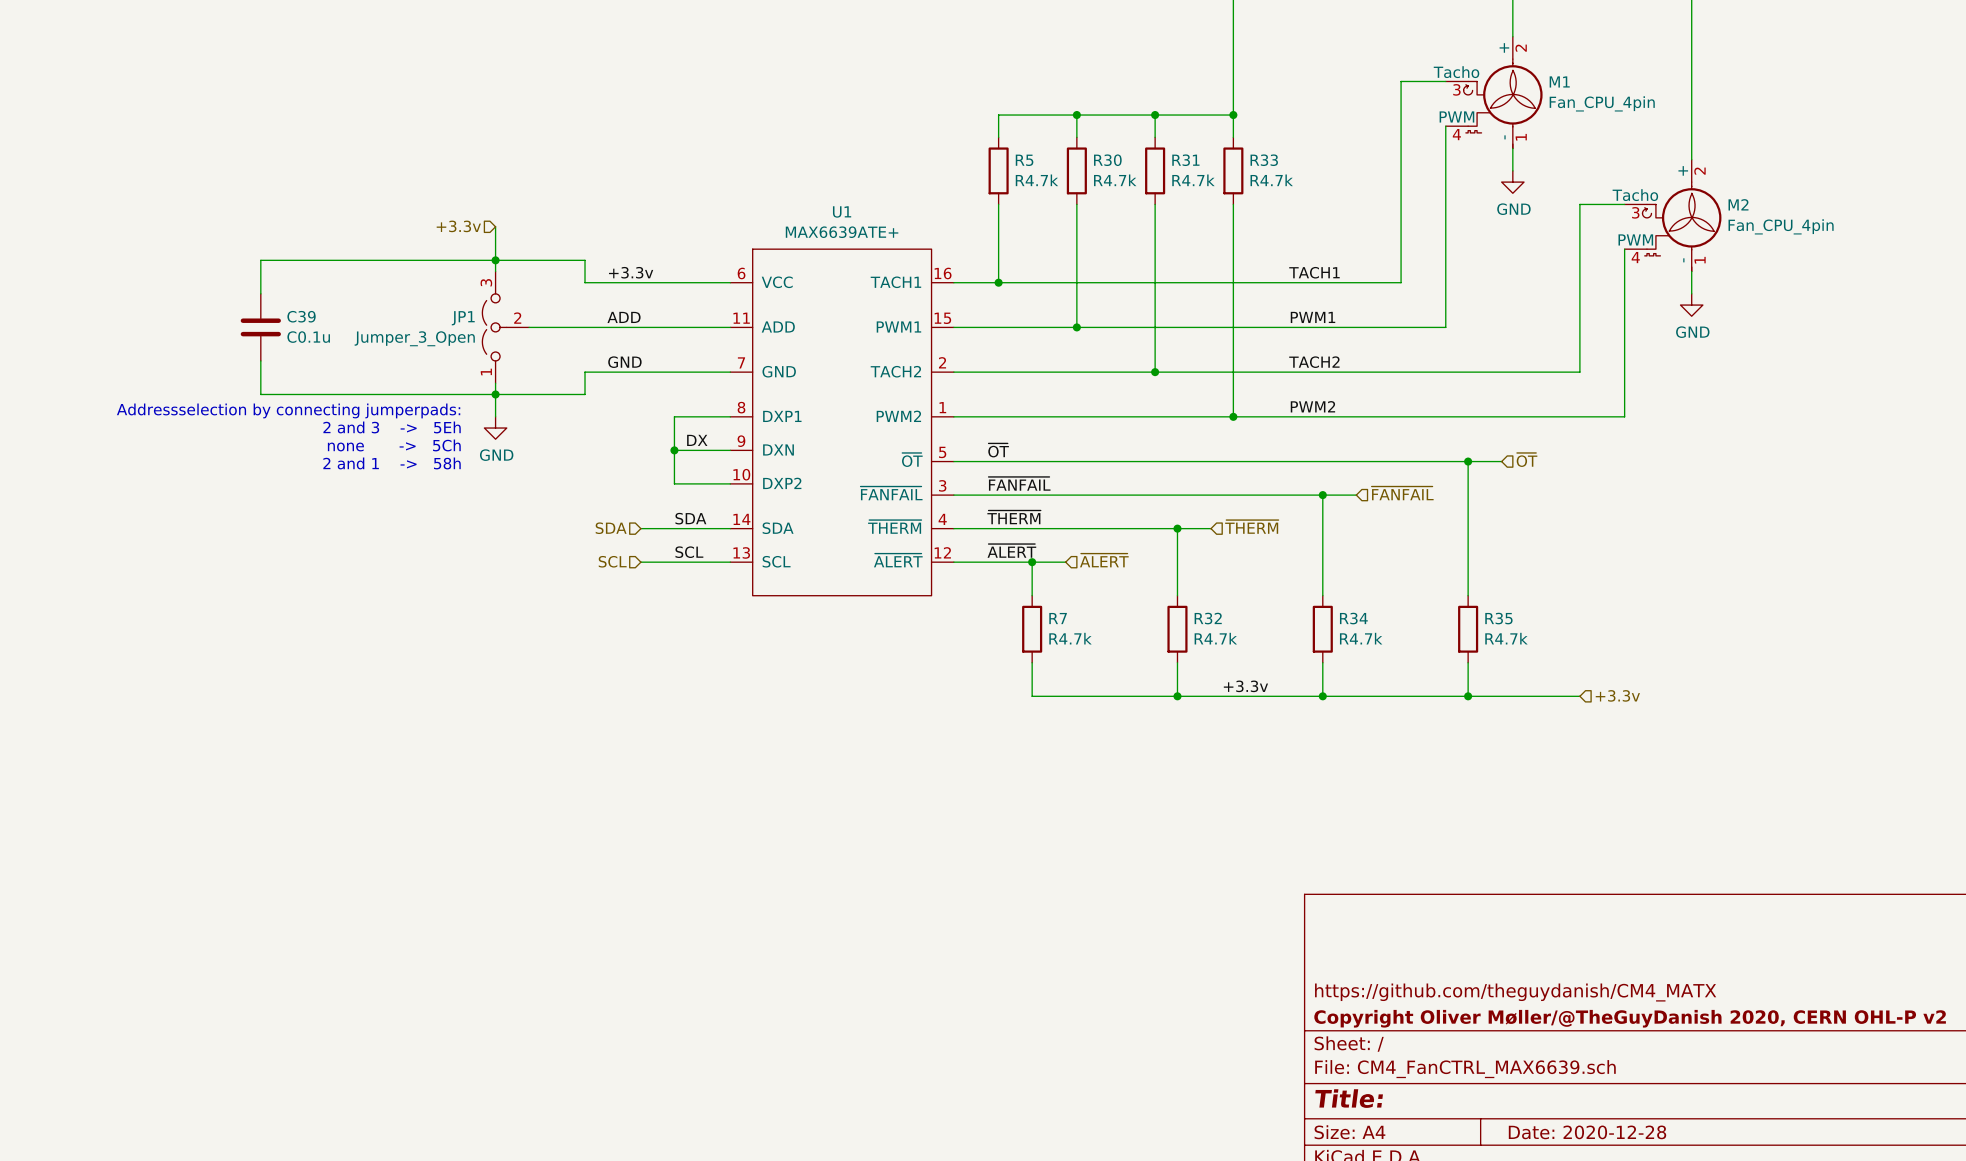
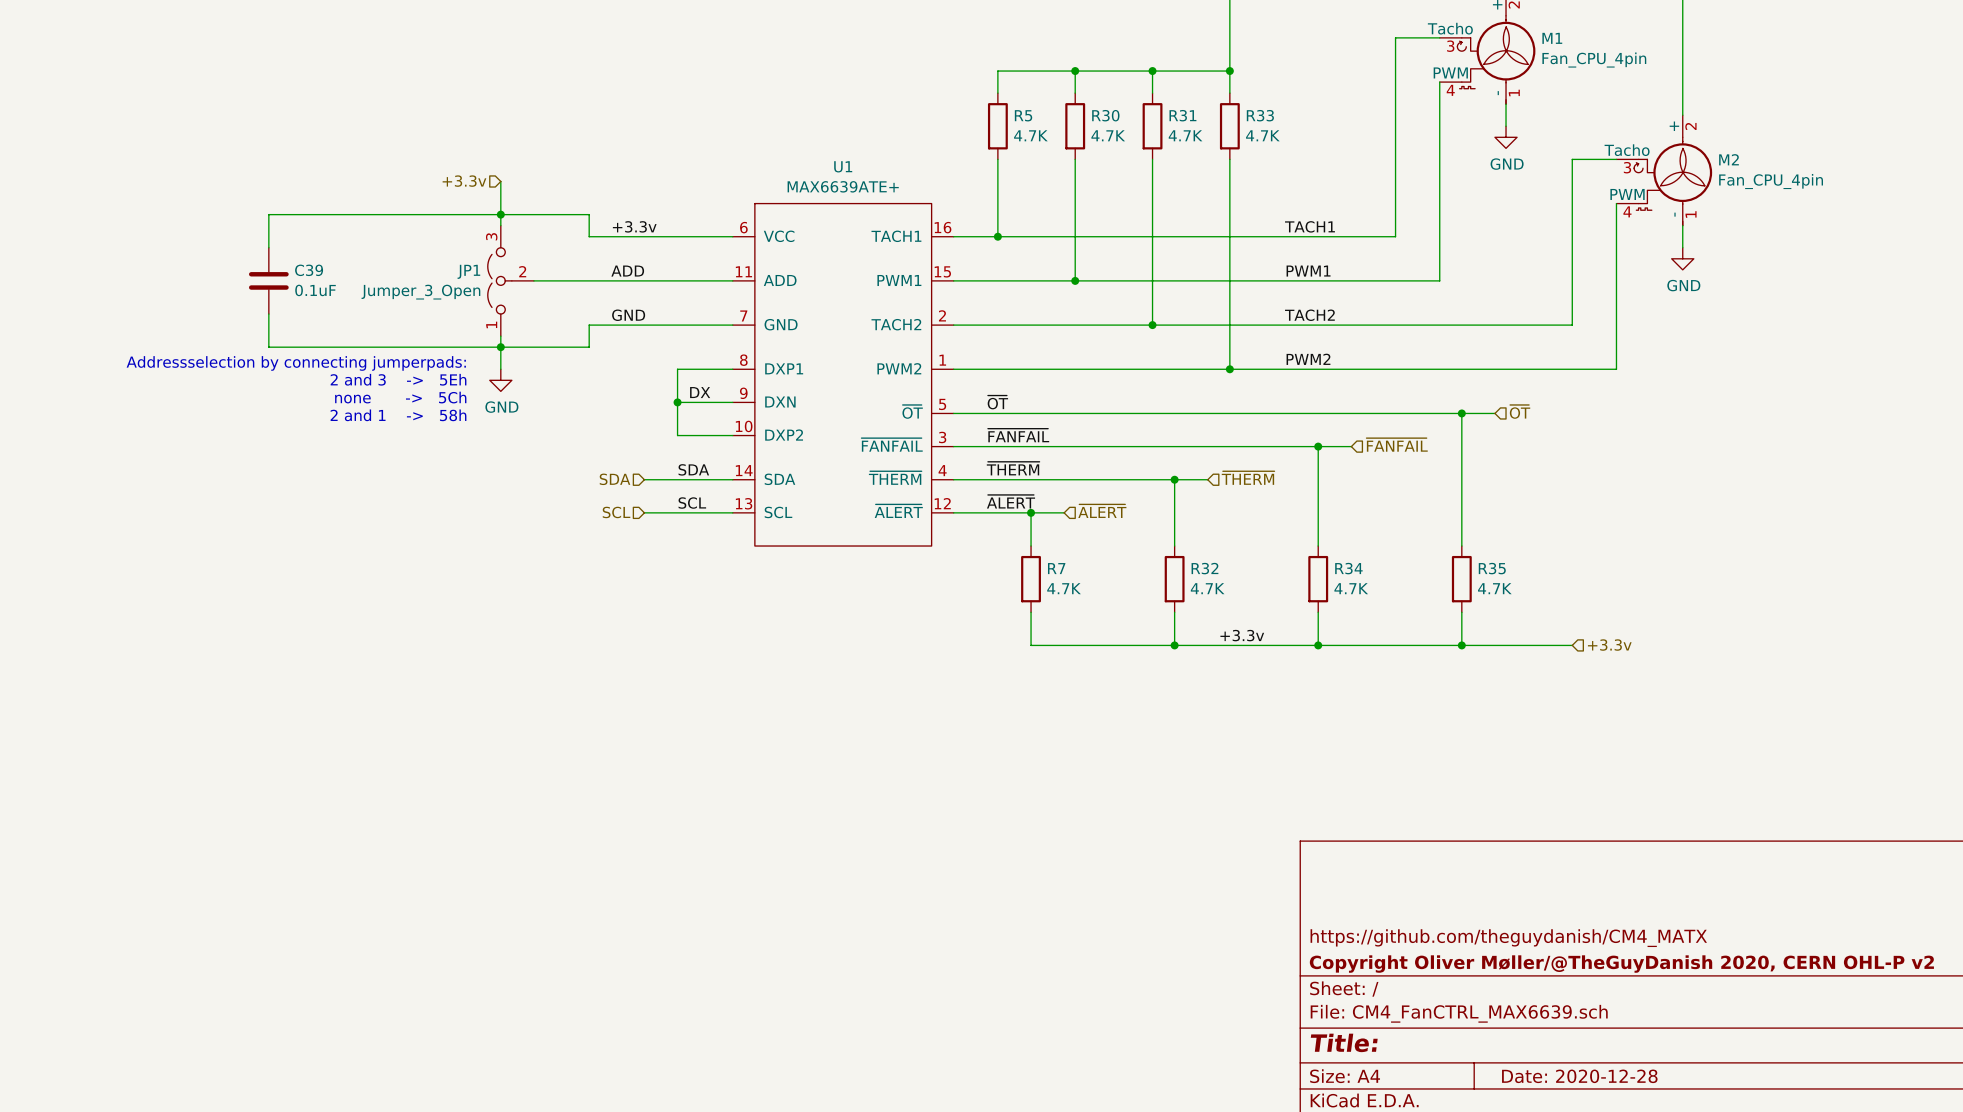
R5 value: R4.7k (1036, 180) -> 4.7K (1030, 135)
R30 value: R4.7k (1115, 180) -> 4.7K (1108, 135)
R31 value: R4.7k (1193, 180) -> 4.7K (1185, 135)
R33 value: R4.7k (1271, 180) -> 4.7K (1262, 135)
C39 value: C0.1u (308, 337) -> 0.1uF (315, 290)
R7 value: R4.7k (1070, 638) -> 4.7K (1064, 588)
R32 value: R4.7k (1215, 638) -> 4.7K (1207, 588)
R34 value: R4.7k (1361, 638) -> 4.7K (1351, 588)
R35 value: R4.7k (1506, 638) -> 4.7K (1494, 588)

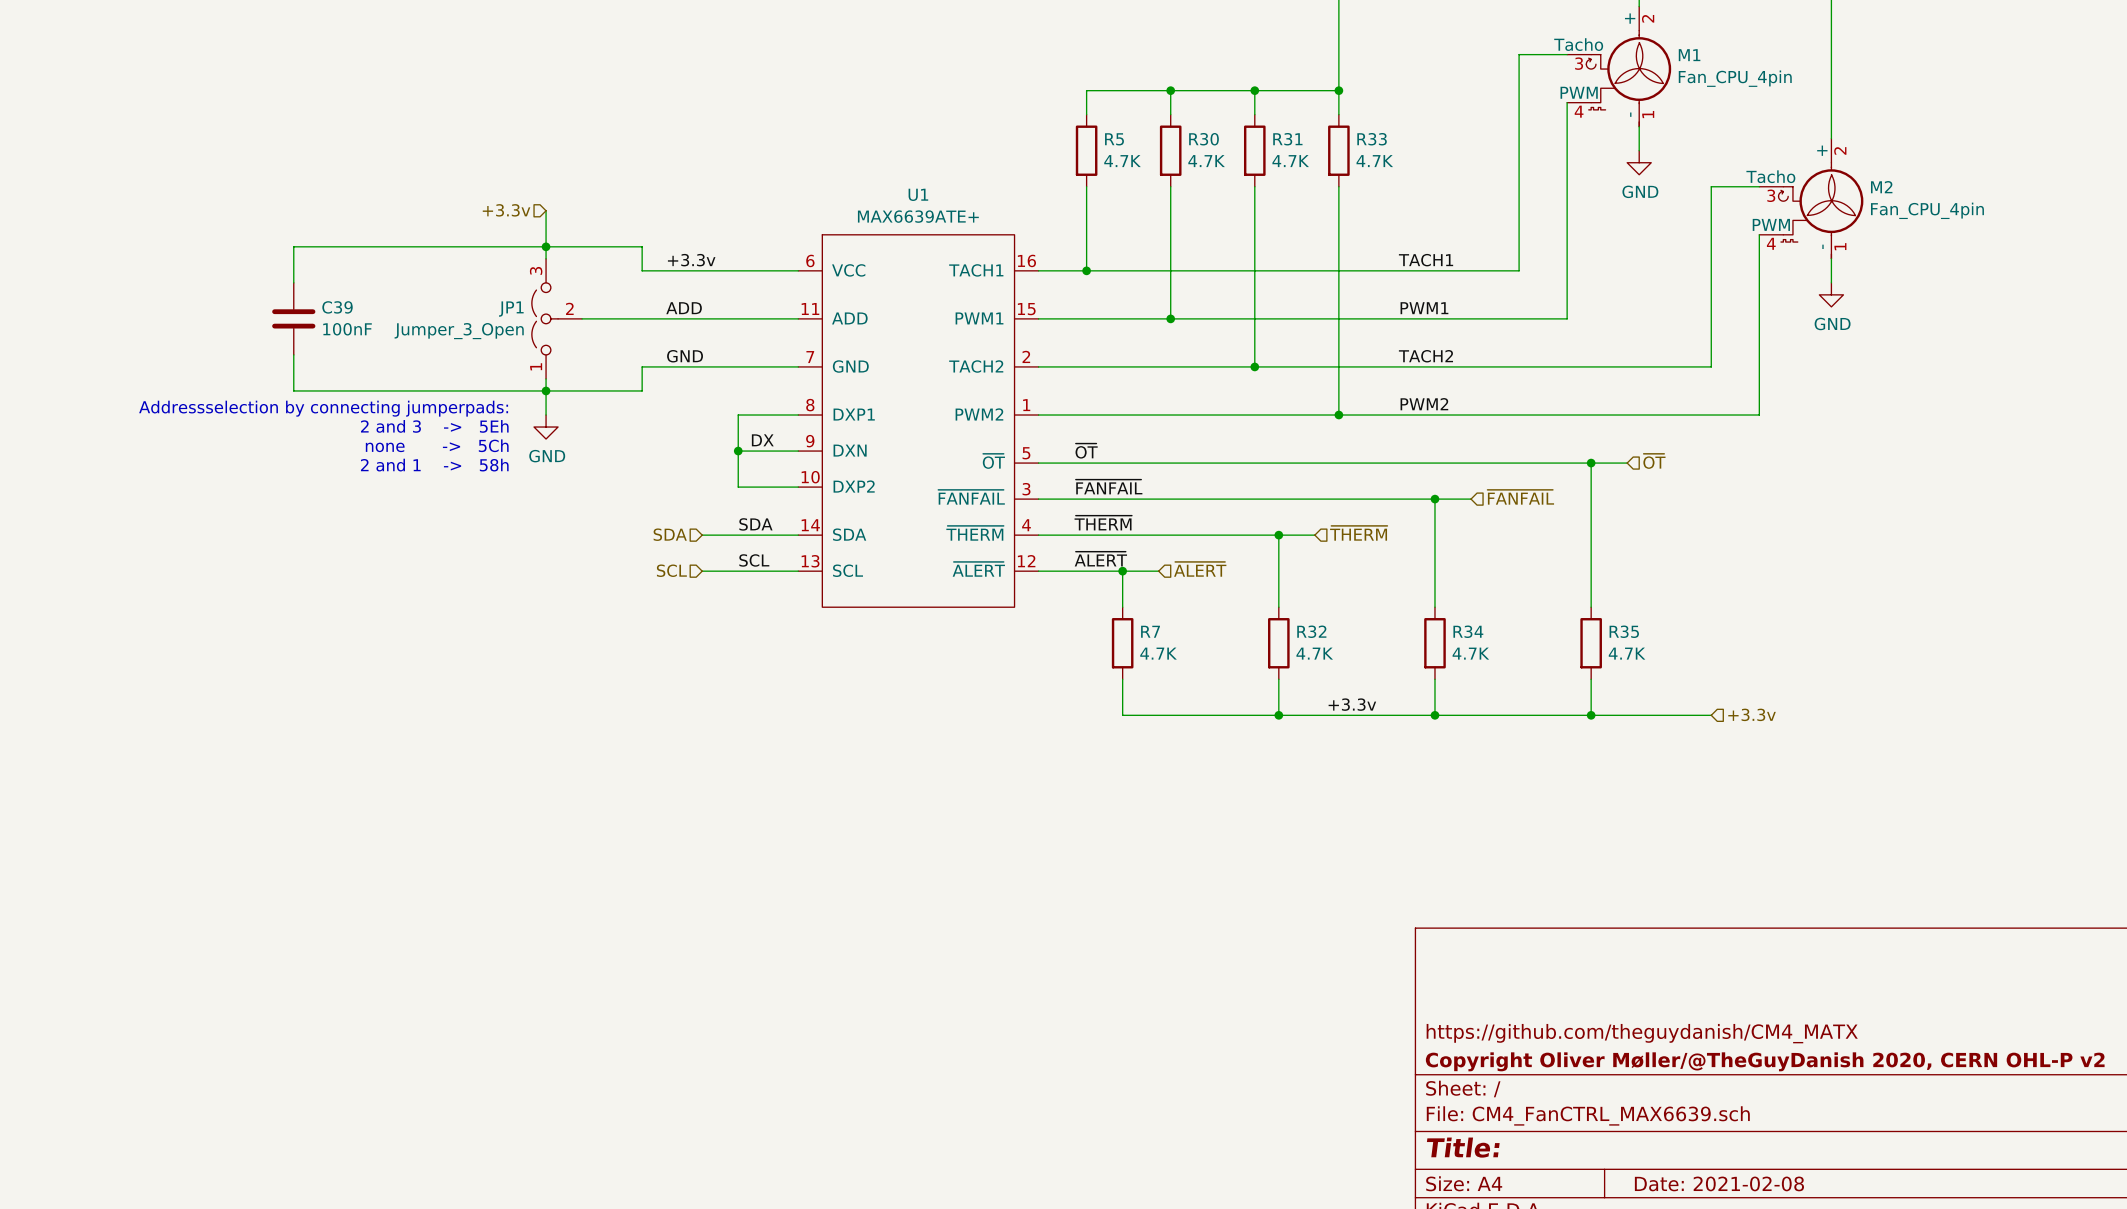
C39 value: 0.1uF (315, 290) -> 100nF (347, 329)
title block: Date: 2020-12-28 (1579, 1076) -> Date: 2021-02-08 (1719, 1183)

